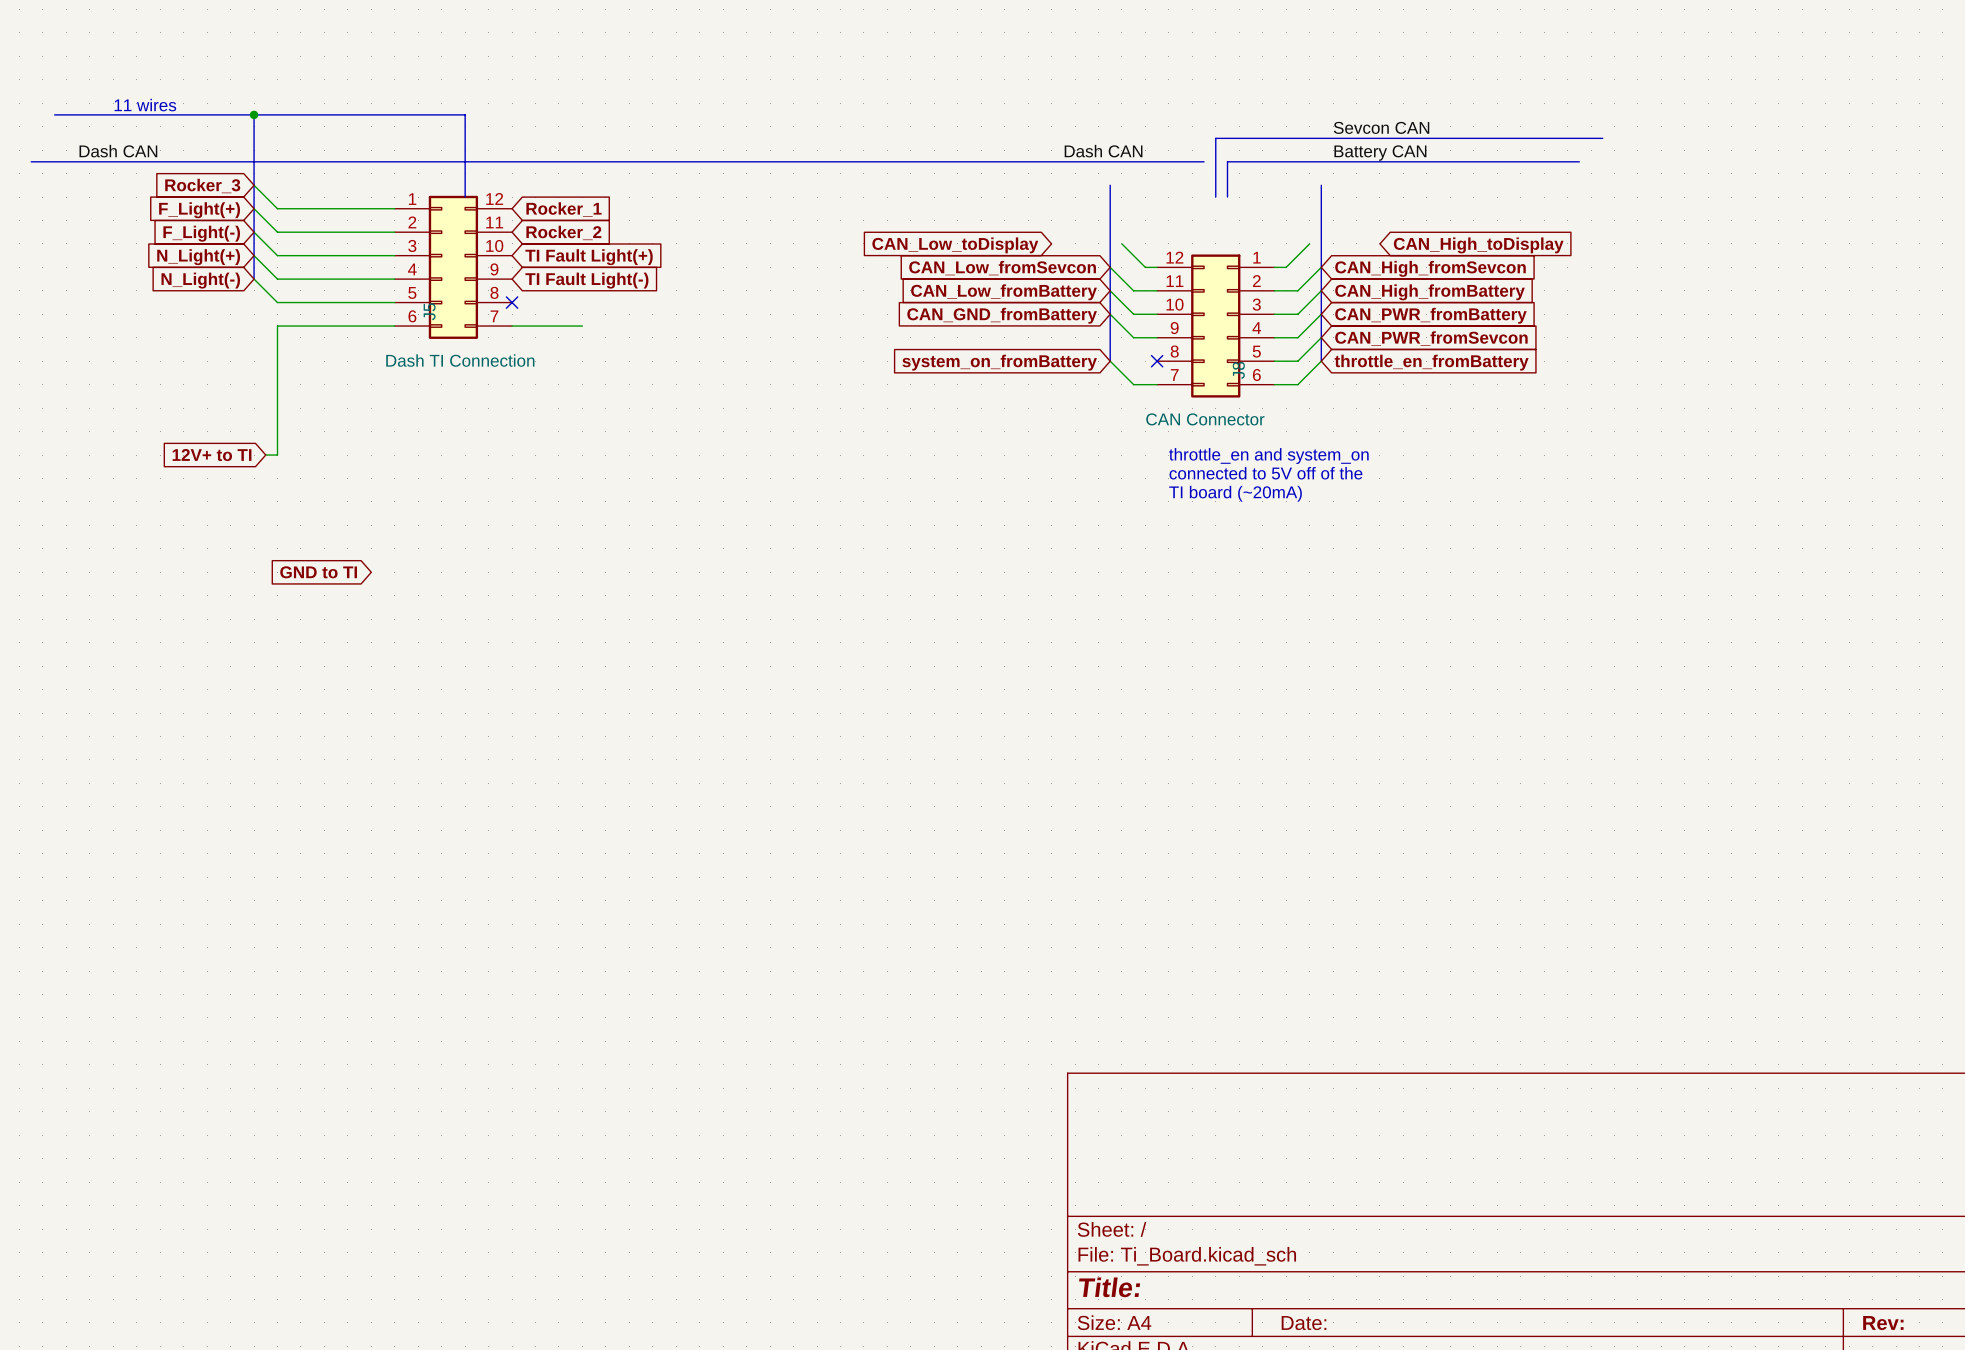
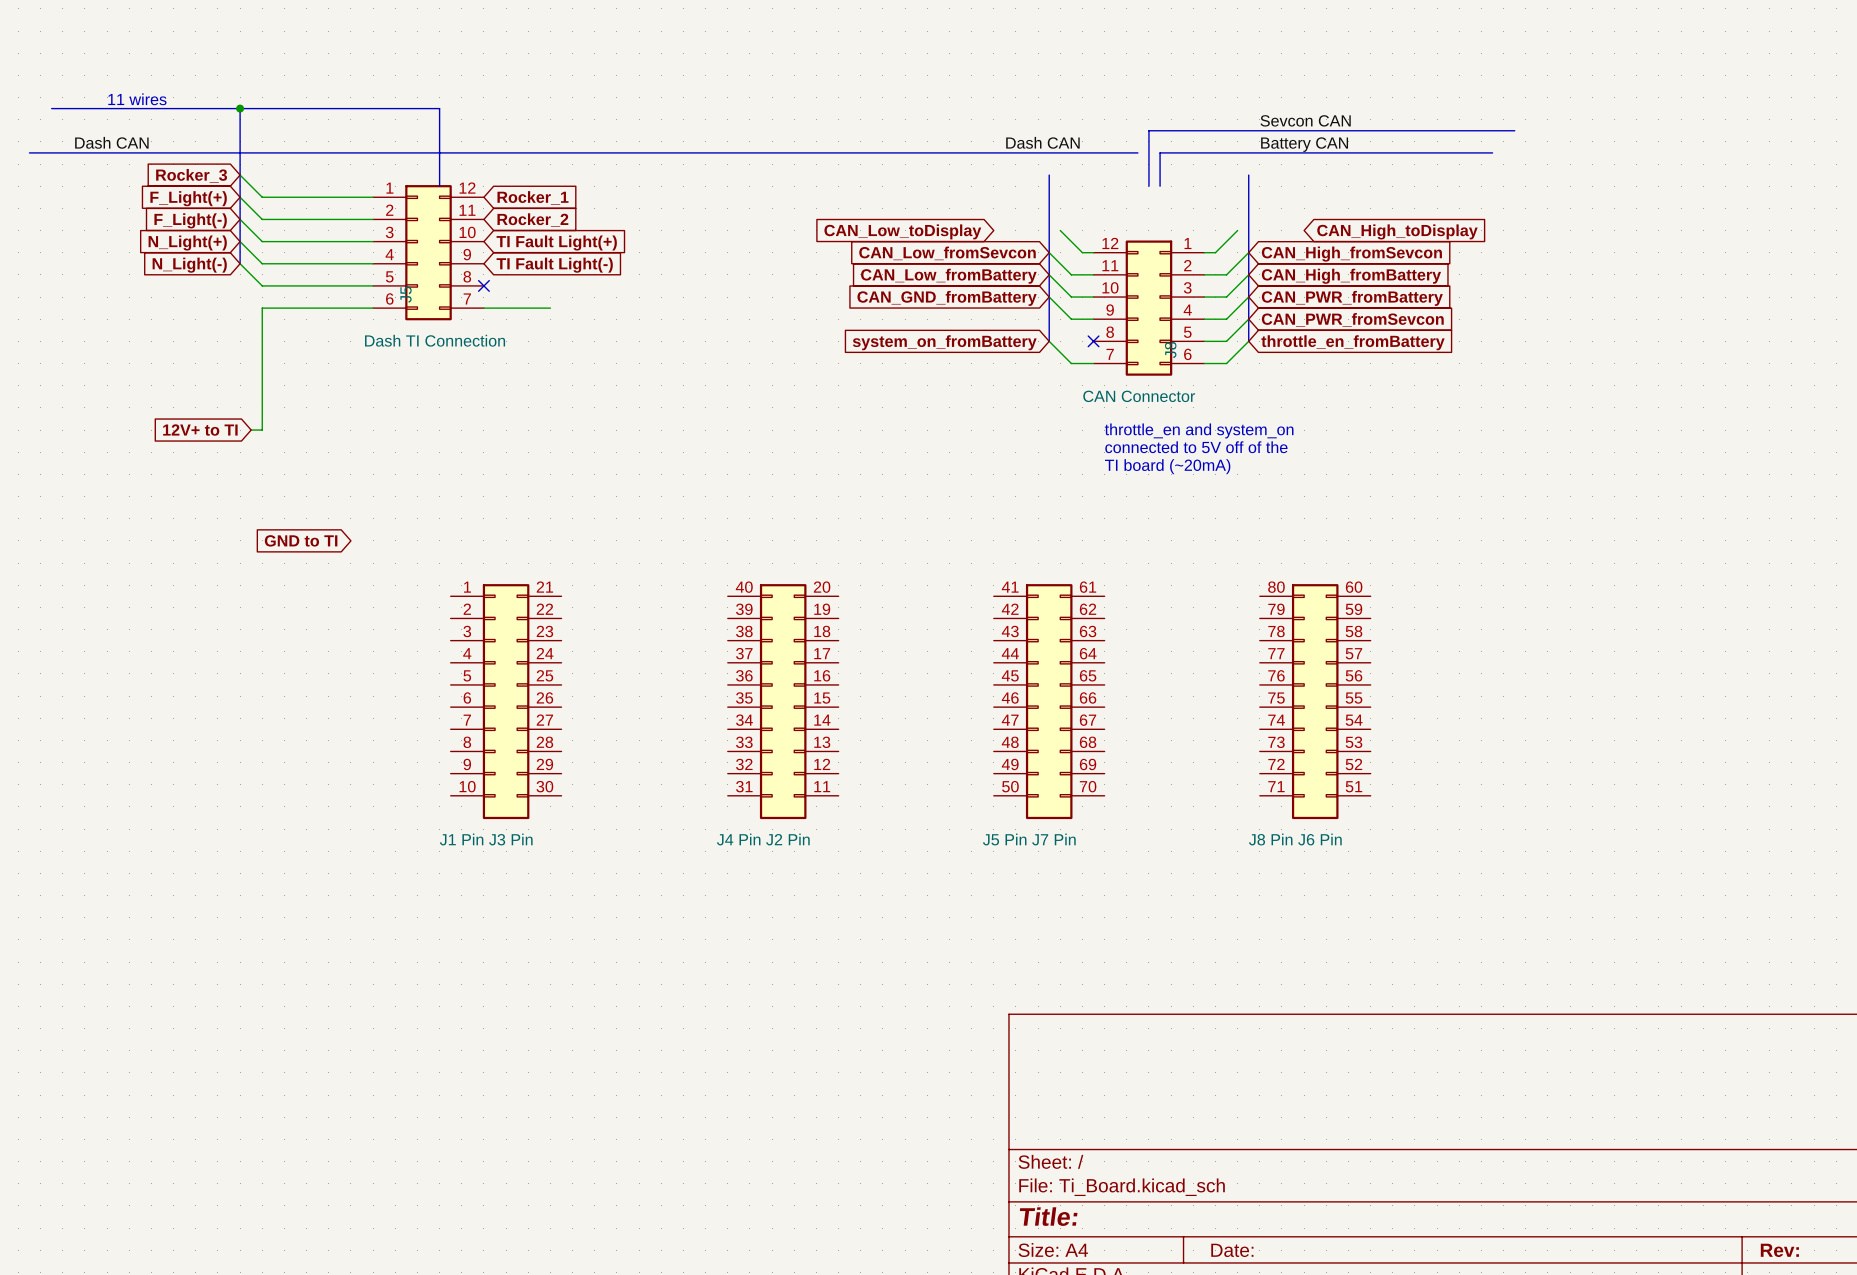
part: none -> J1 Pin J3 Pin (506, 701)
part: none -> J4 Pin J2 Pin (783, 701)
part: none -> J5 Pin J7 Pin (1049, 701)
part: none -> J8 Pin J6 Pin (1315, 701)

